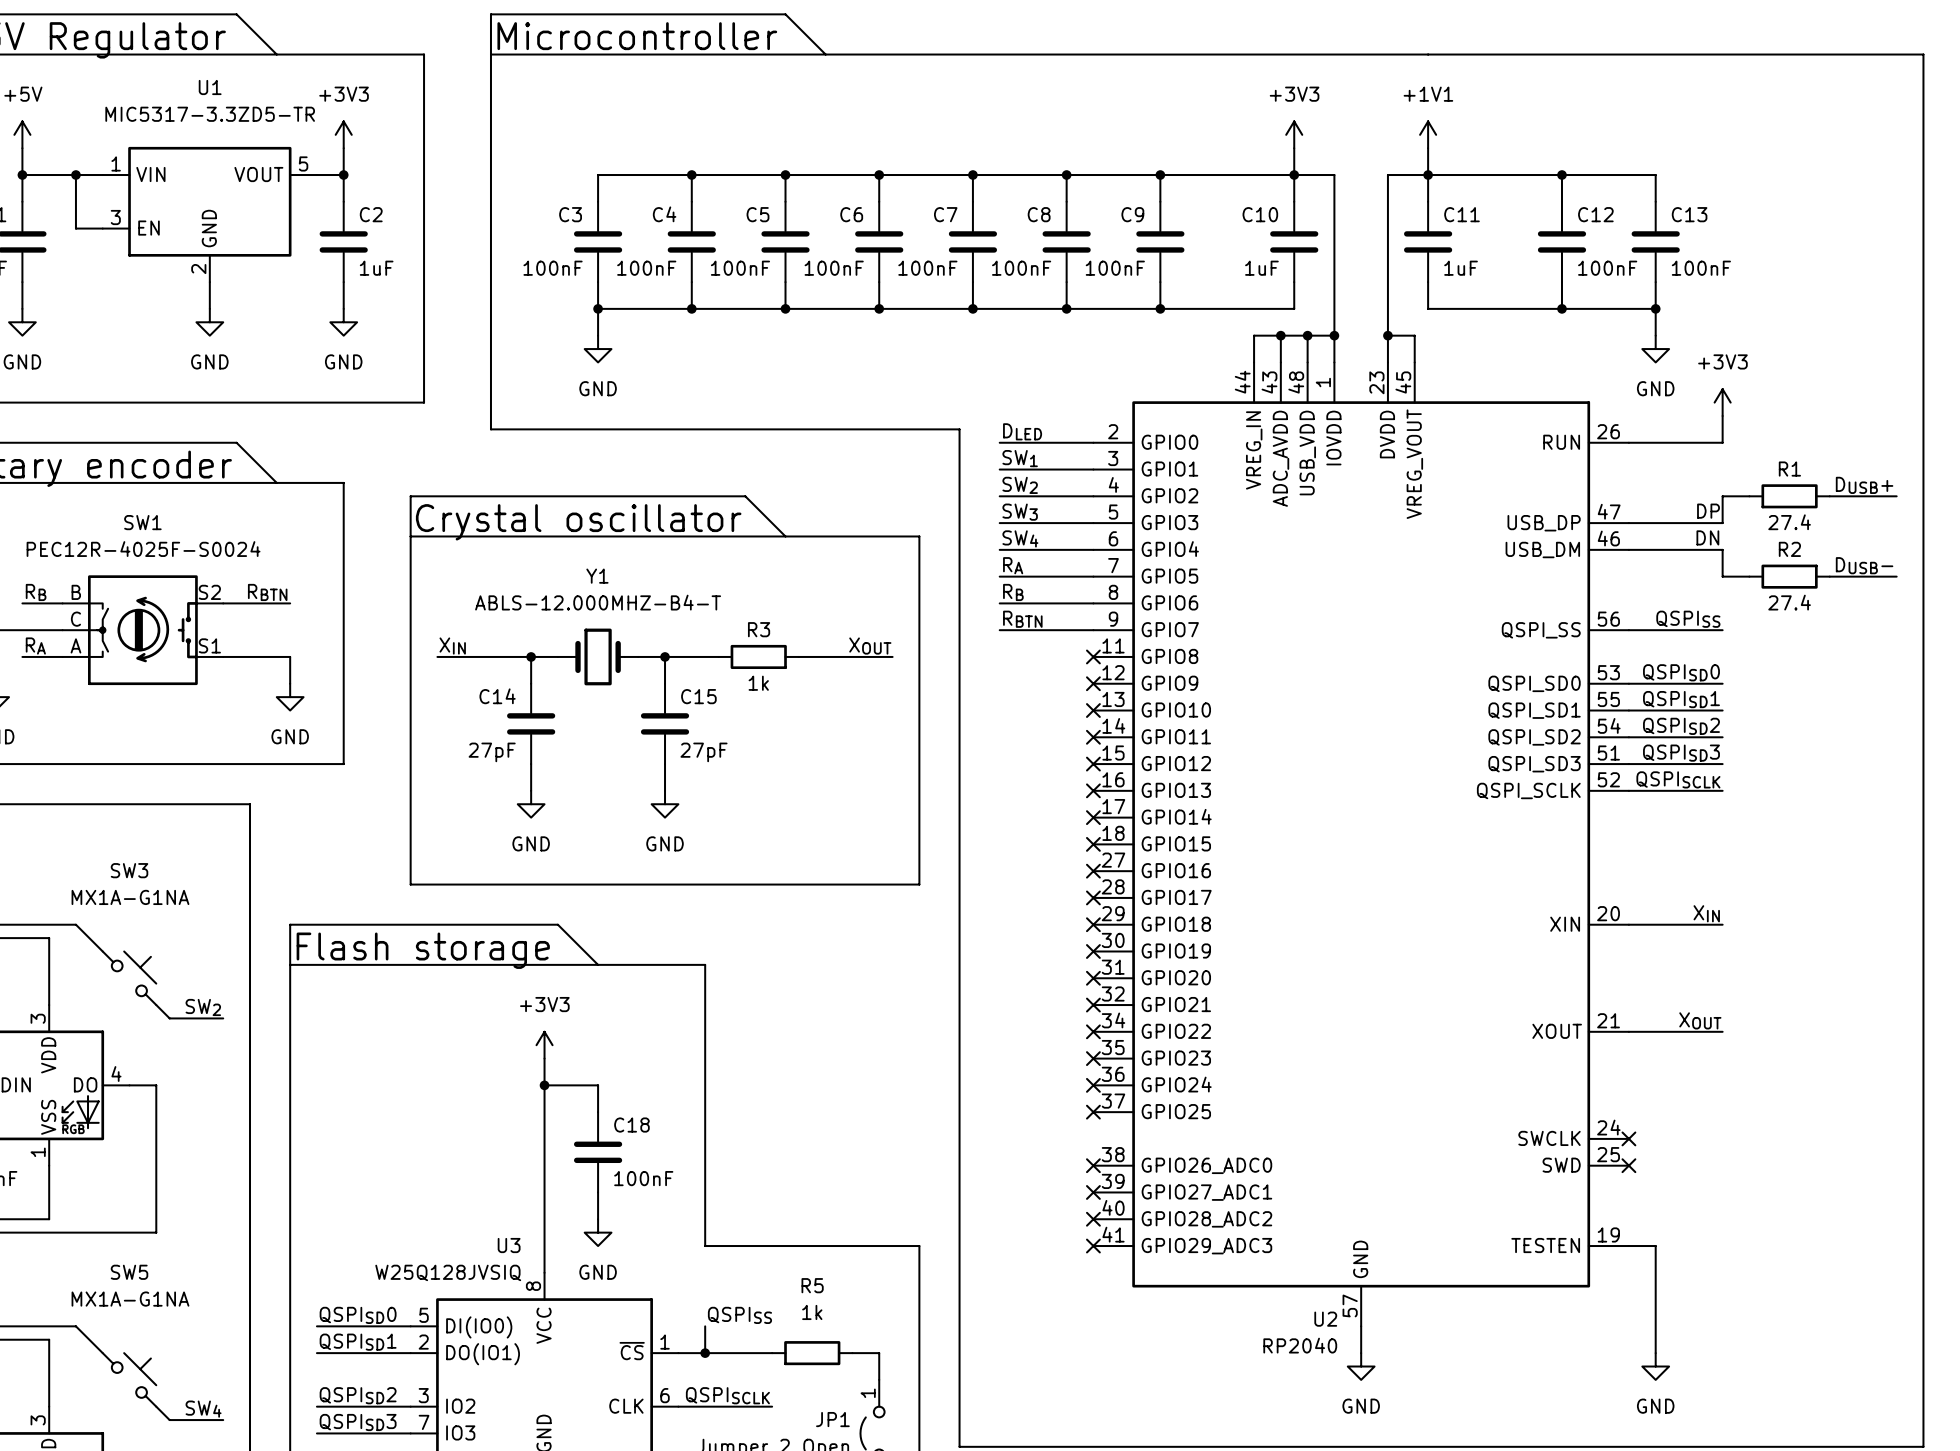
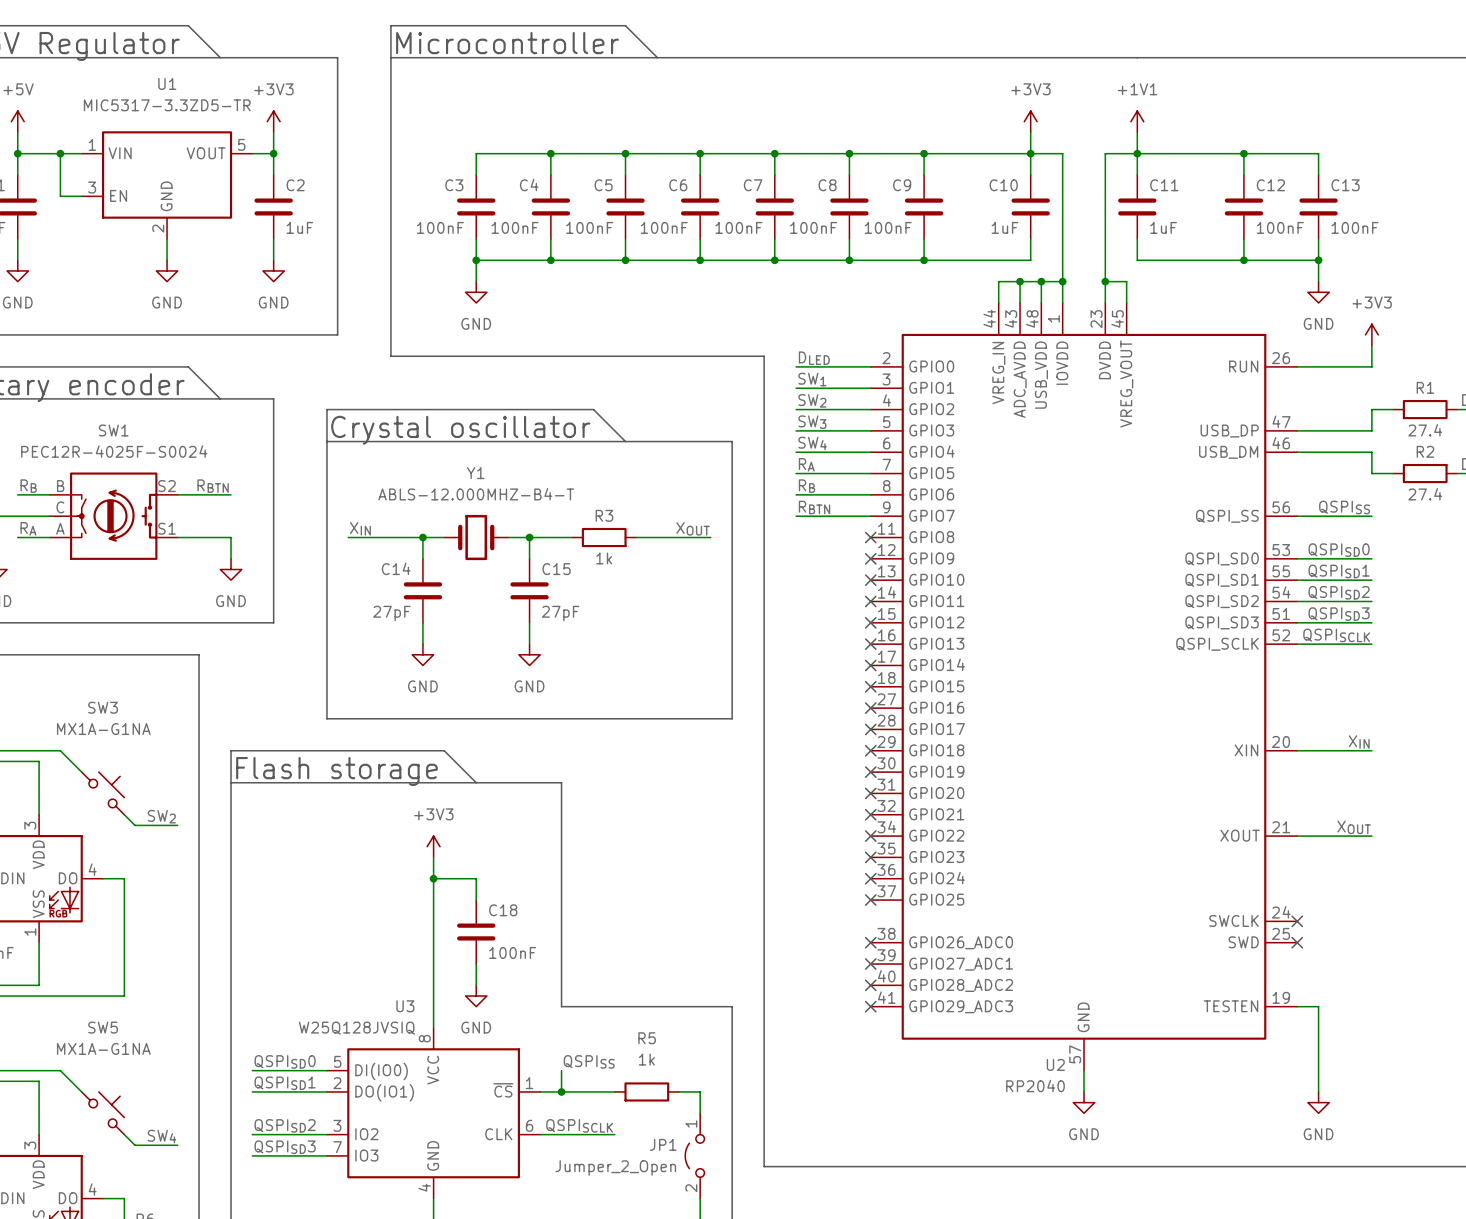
label: DP (1708, 511) -> none
label: DN (1707, 537) -> none

